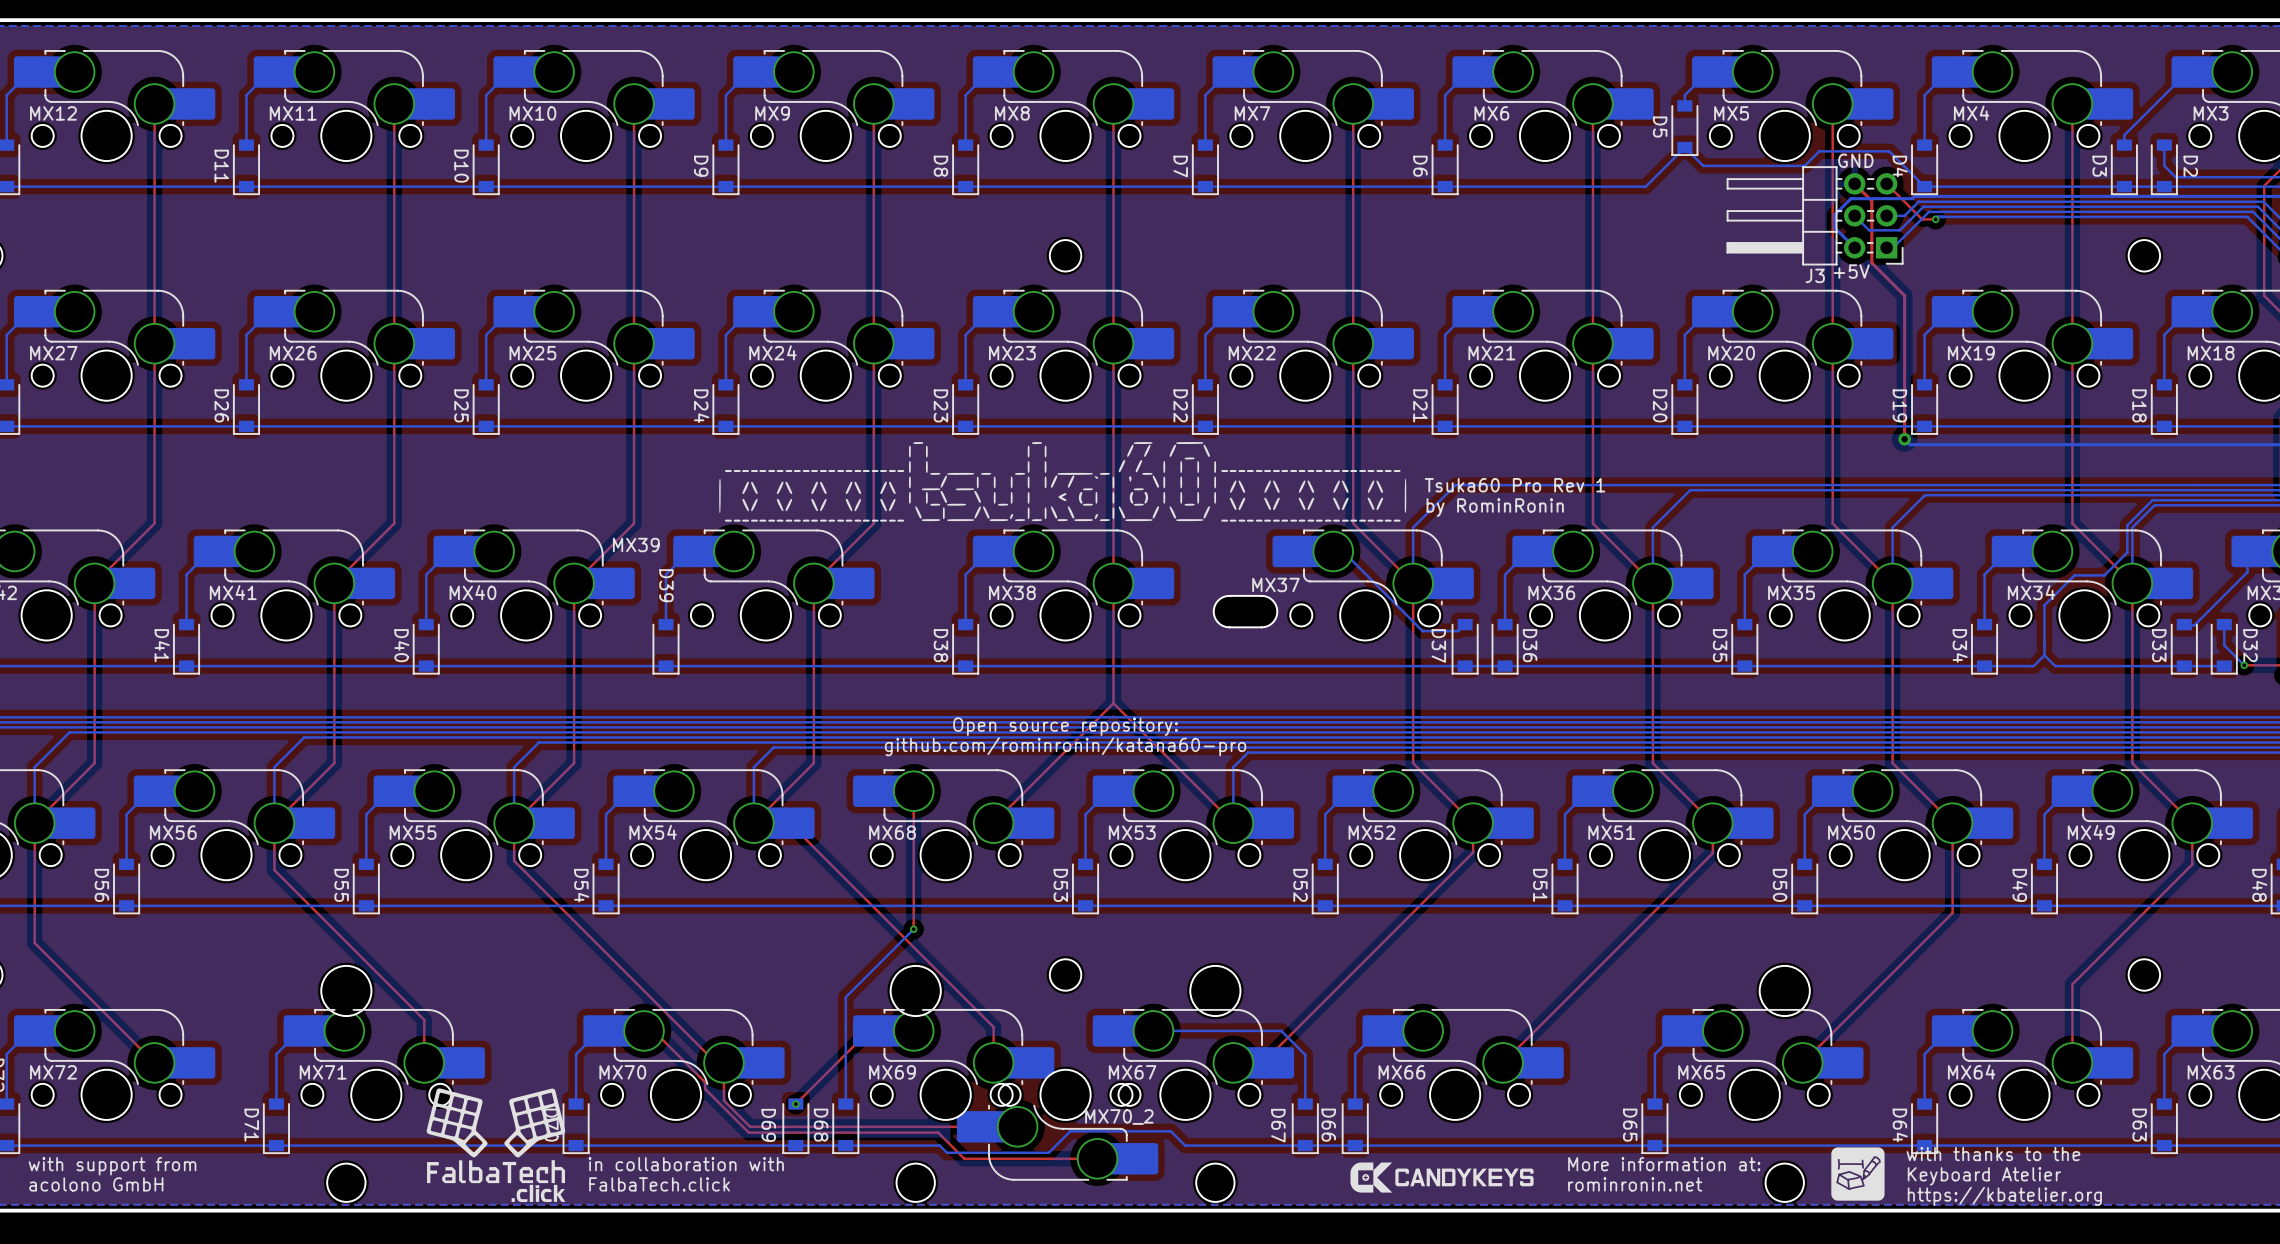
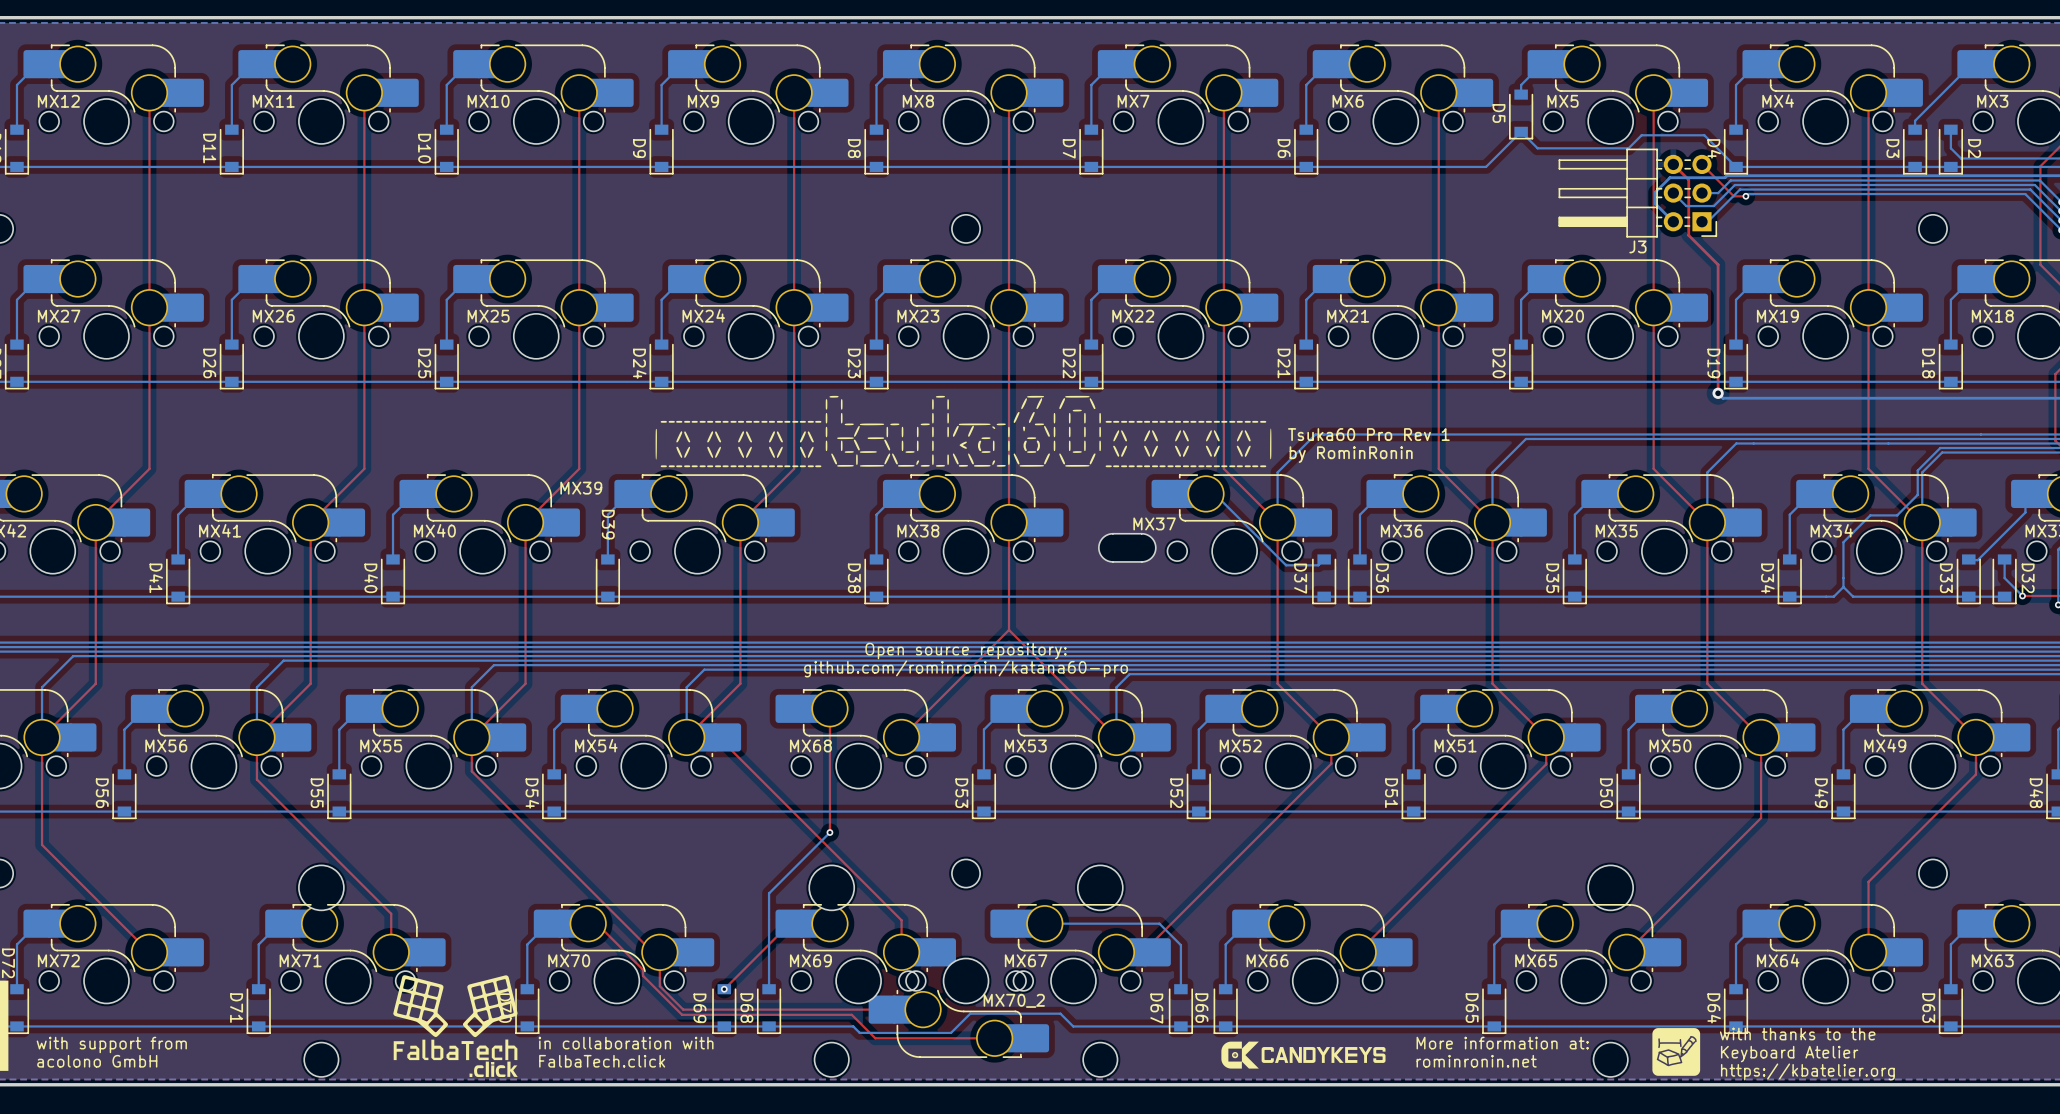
text: GND (1855, 160) -> none
text: +5V (1851, 271) -> none

